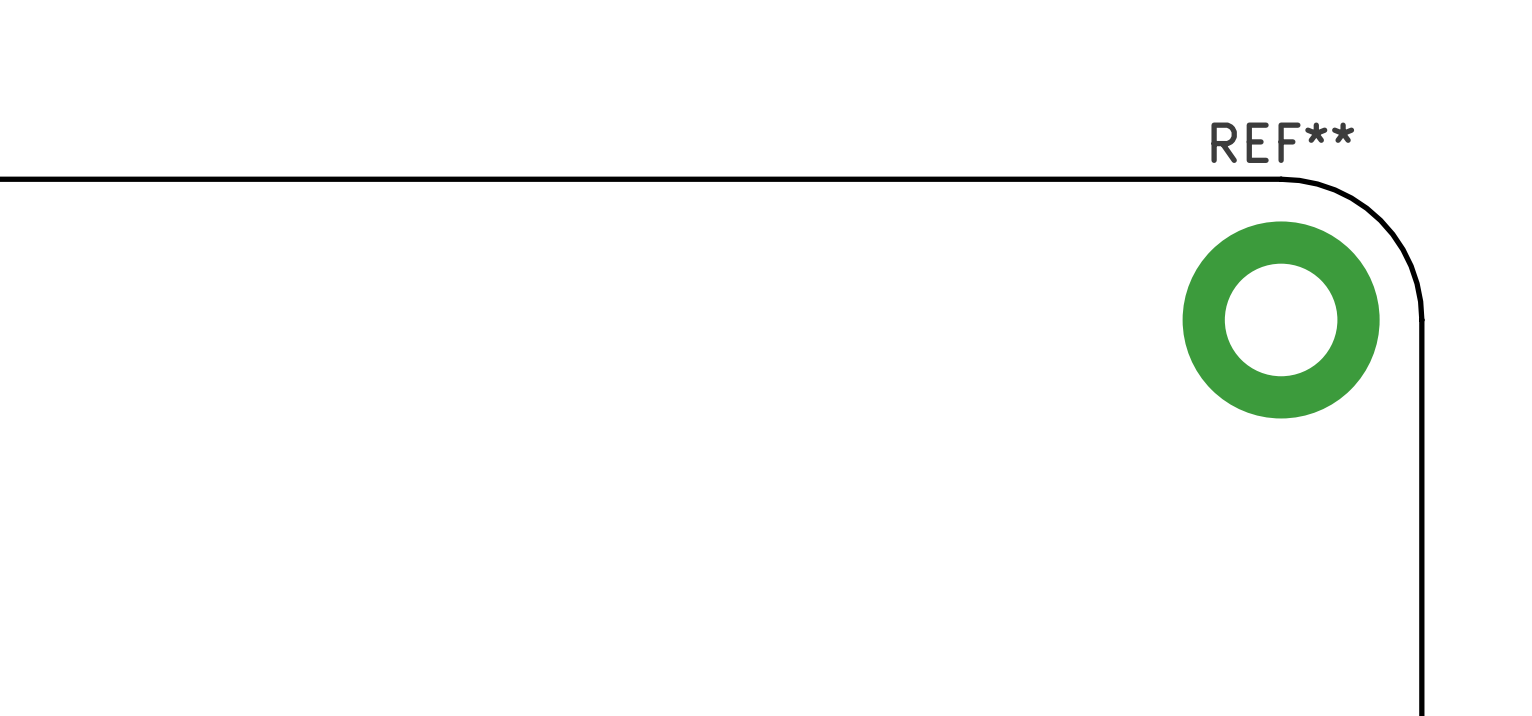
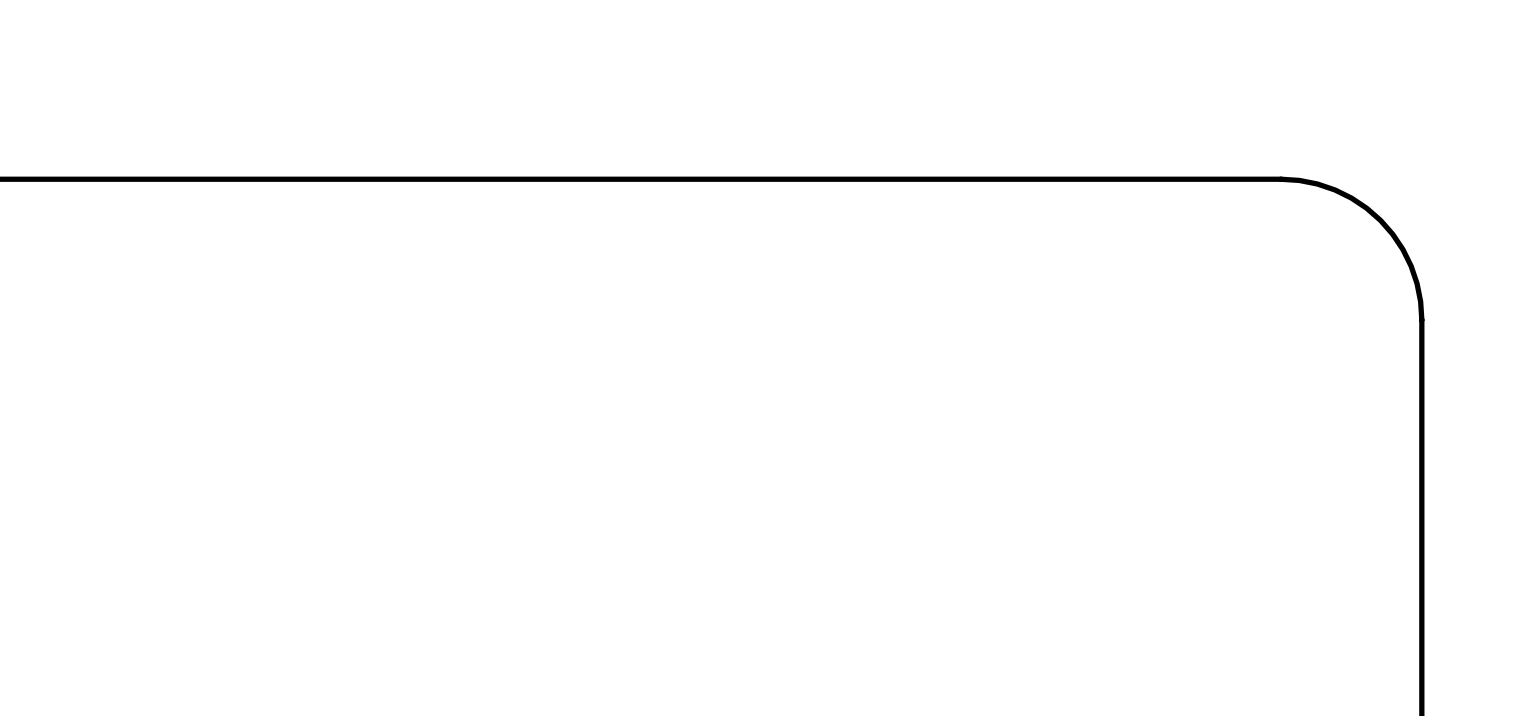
REF**: (1281, 319) -> none

